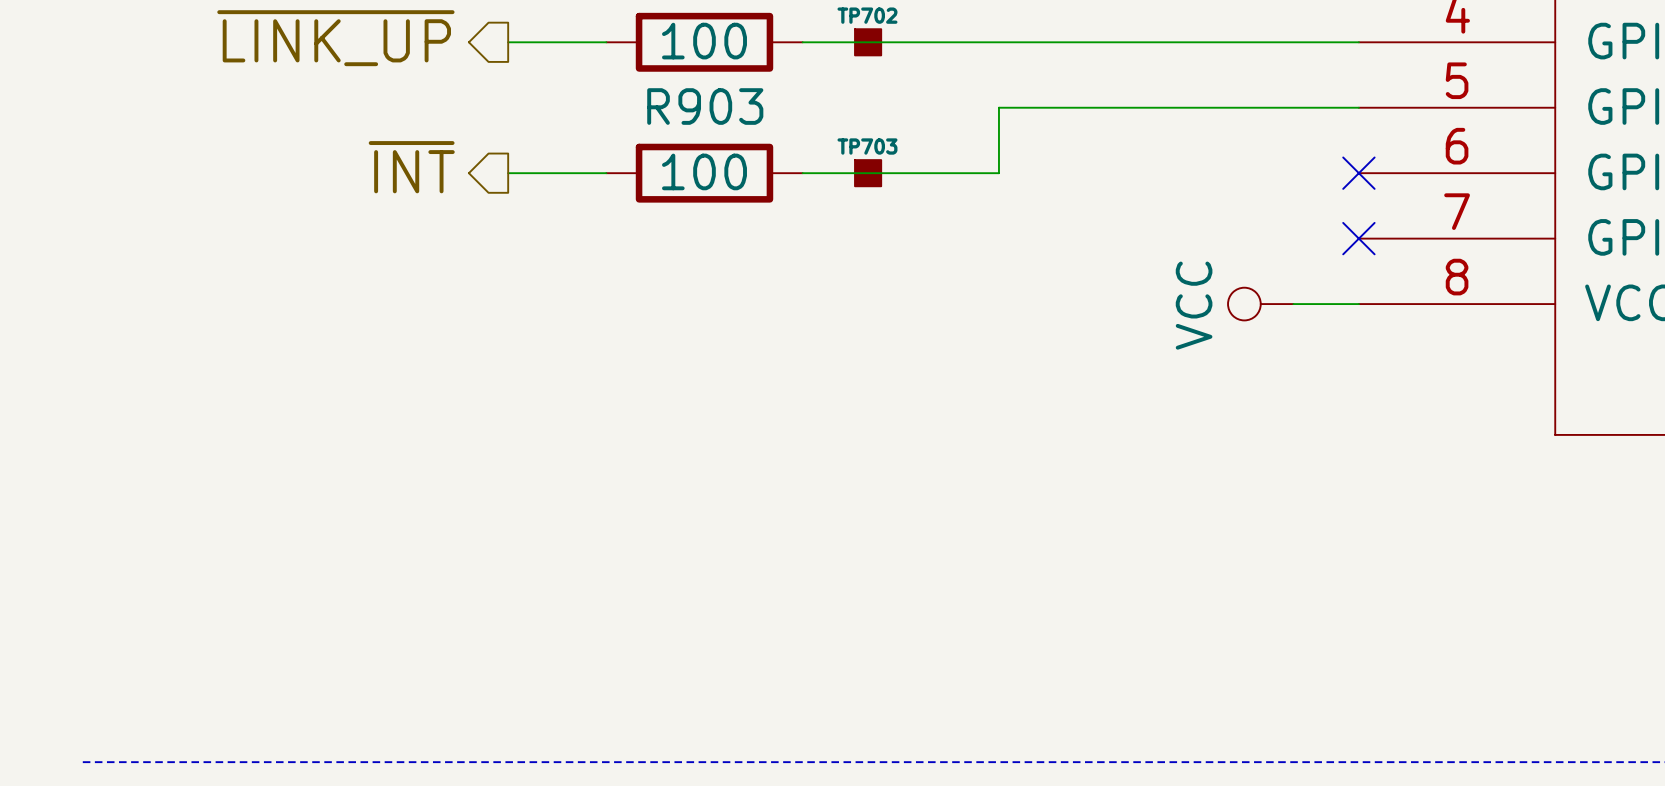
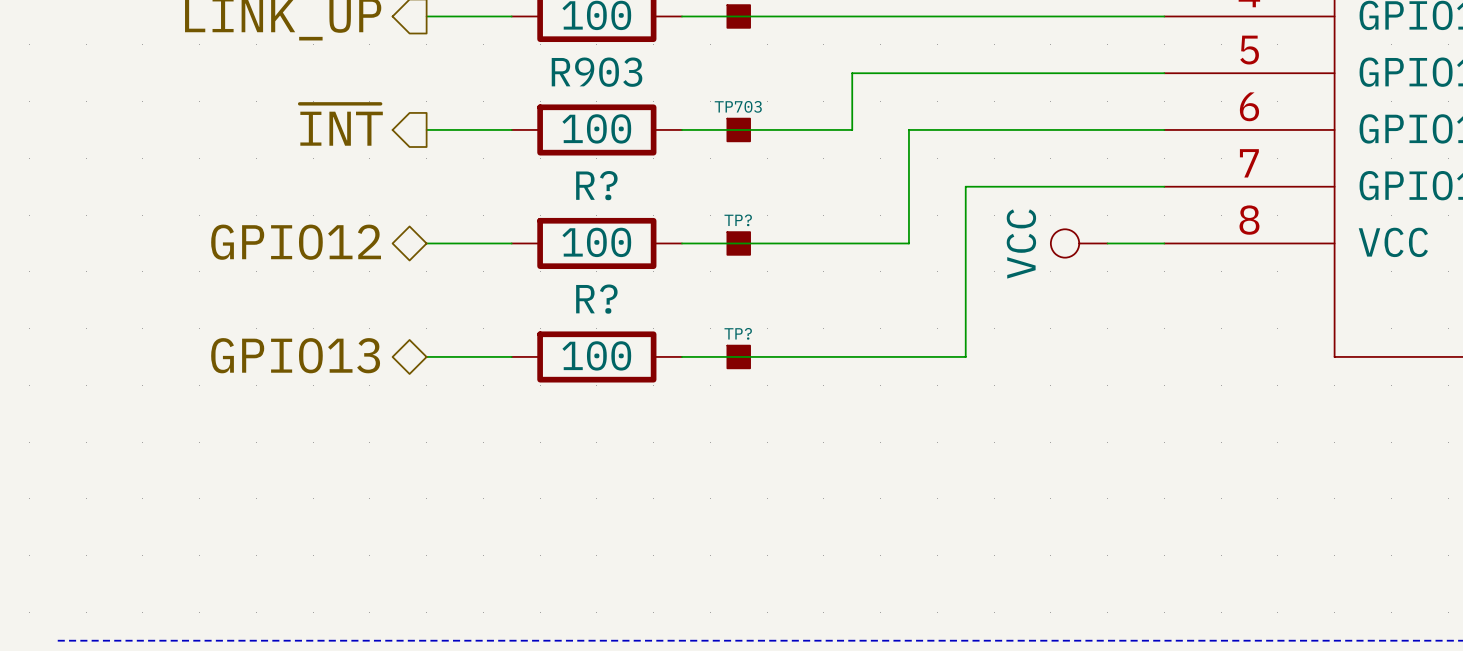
wire: none -> (1164, 129) (908, 129) (908, 243) (681, 243)
no-connect mark: (1358, 173) -> none
wire: none -> (1164, 186) (965, 186) (965, 356) (681, 356)
no-connect mark: (1358, 238) -> none
hierarchical label: none -> GPIO12 (296, 242)
wire: none -> (426, 243) (511, 243)
R?: none -> 100 (596, 243)
TP?: none -> (738, 243)
hierarchical label: none -> GPIO13 (295, 355)
wire: none -> (426, 356) (511, 356)
R?: none -> 100 (596, 356)
TP?: none -> (738, 356)

